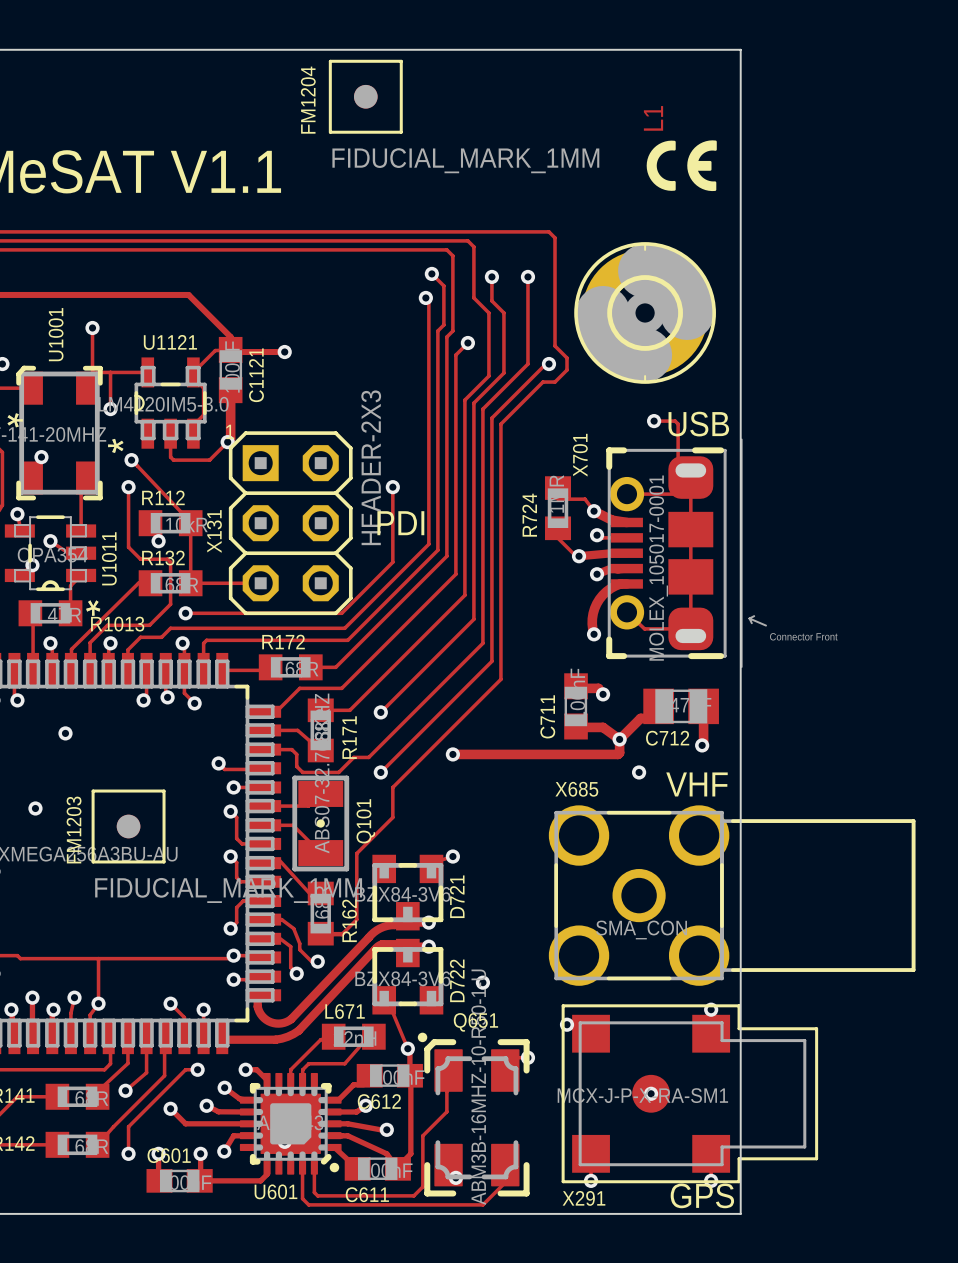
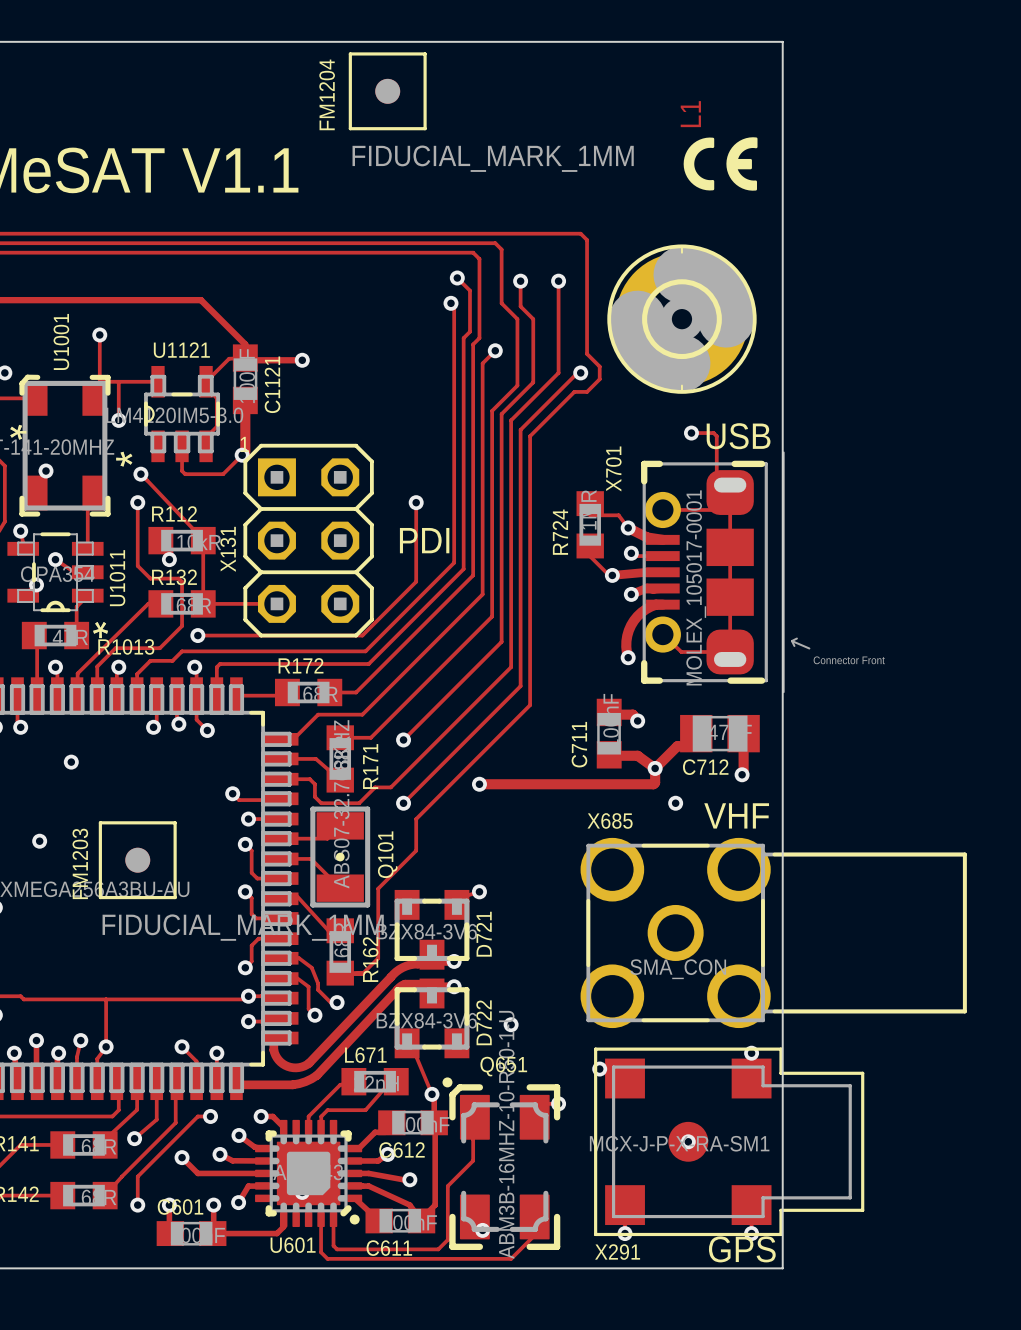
X131 value: HEADER-2X3 (371, 467) -> none

